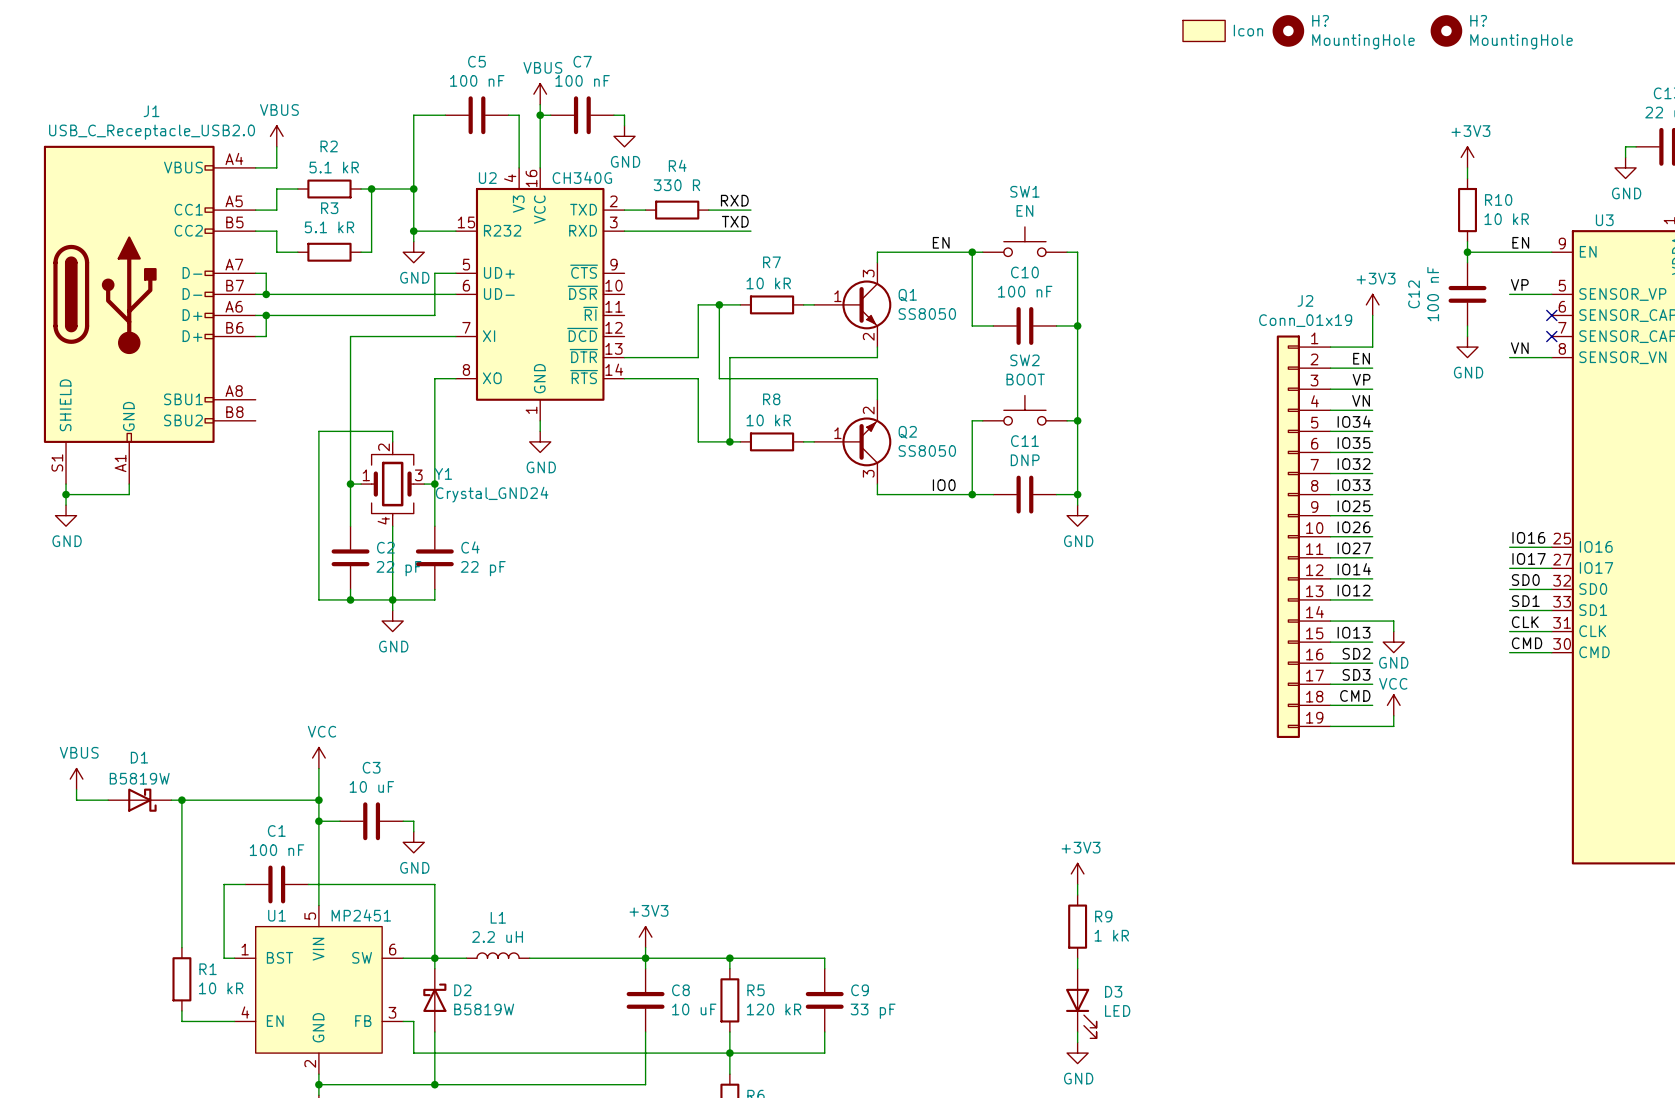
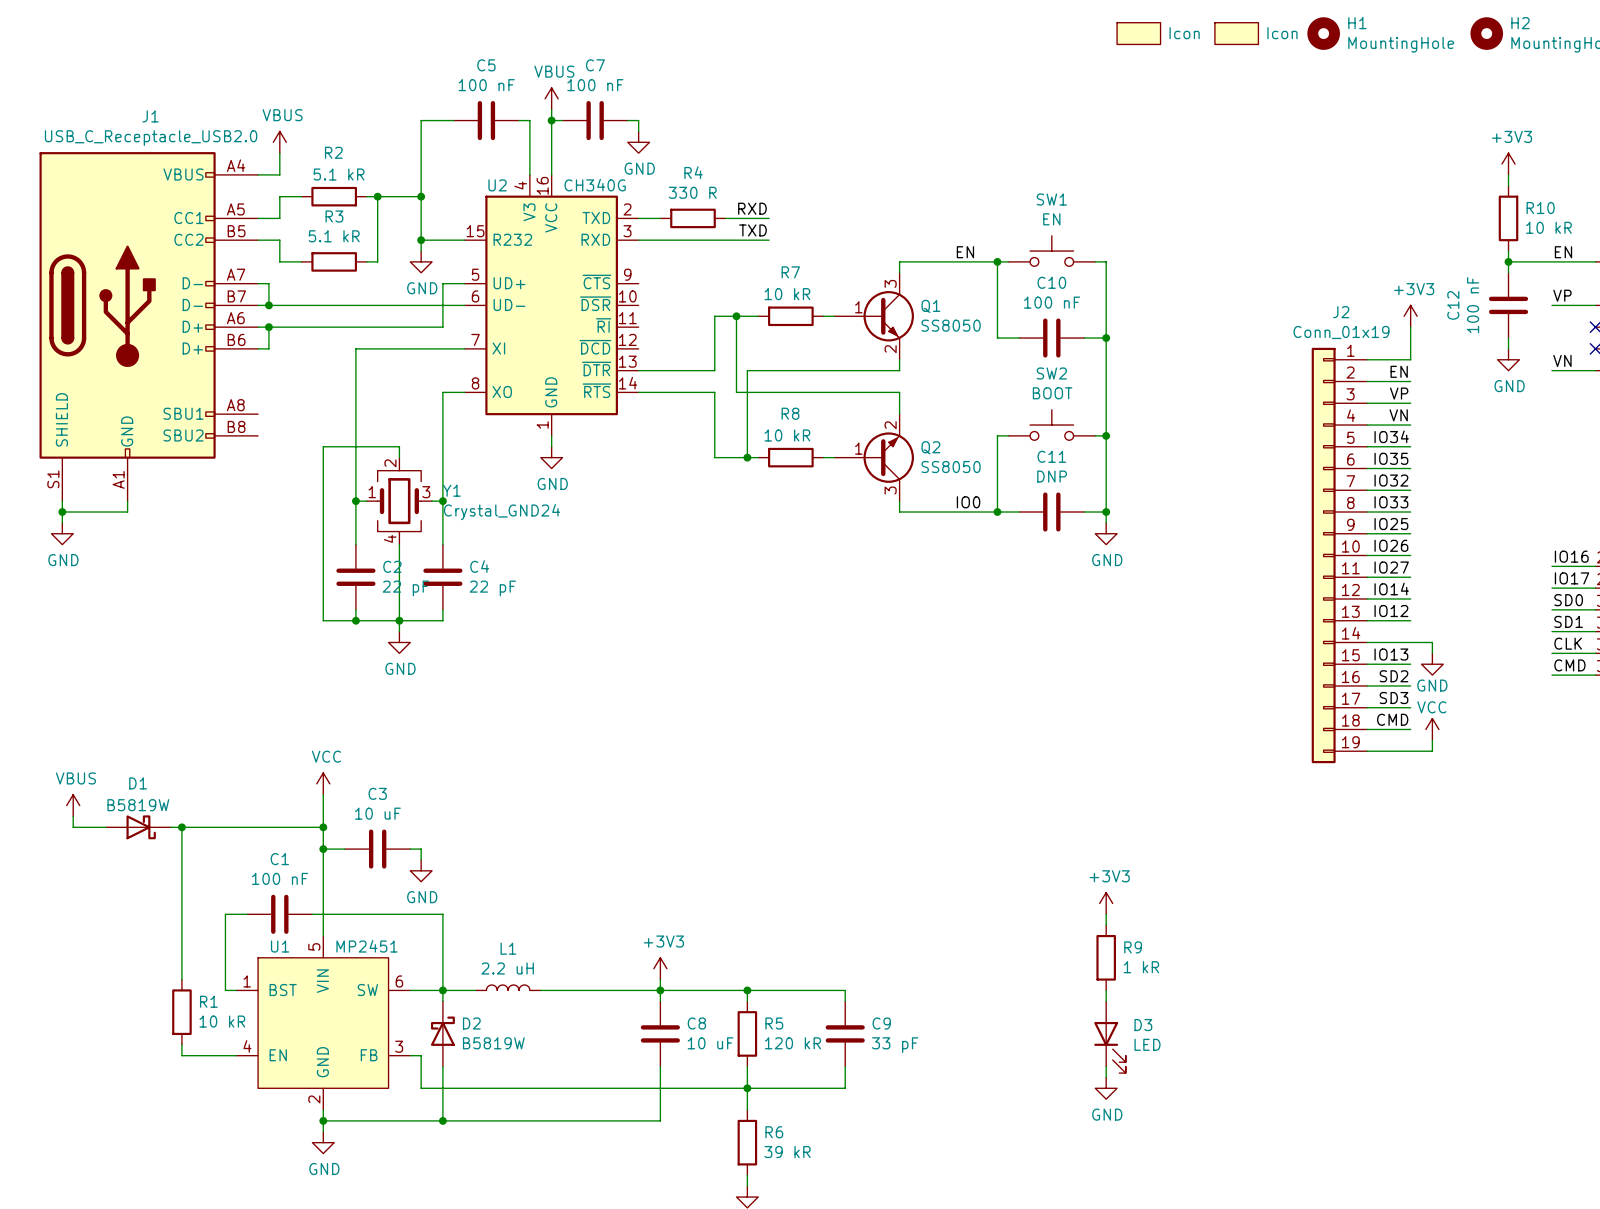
H? name: H? (1320, 20) -> H1 (1357, 23)
H? name: H? (1478, 20) -> H2 (1520, 23)
part: none -> Icon (1138, 33)

